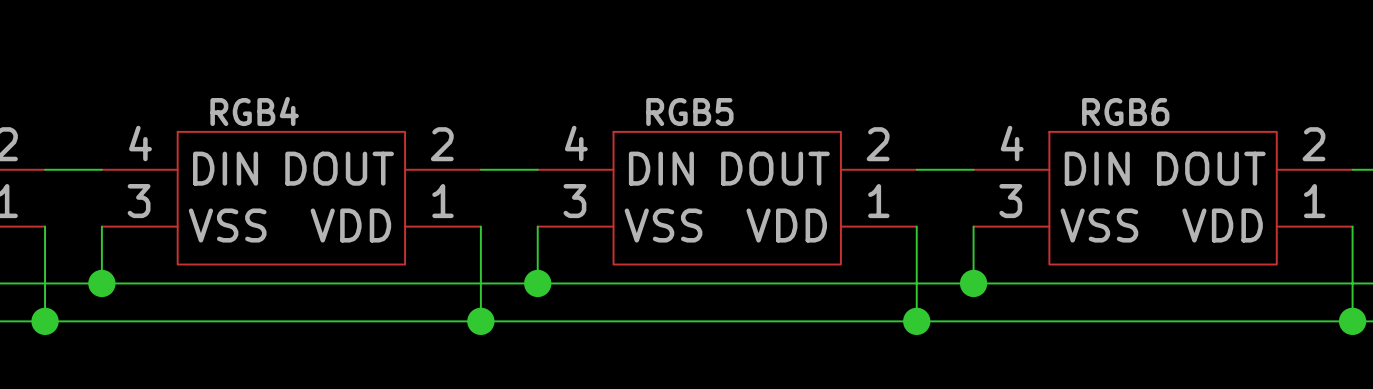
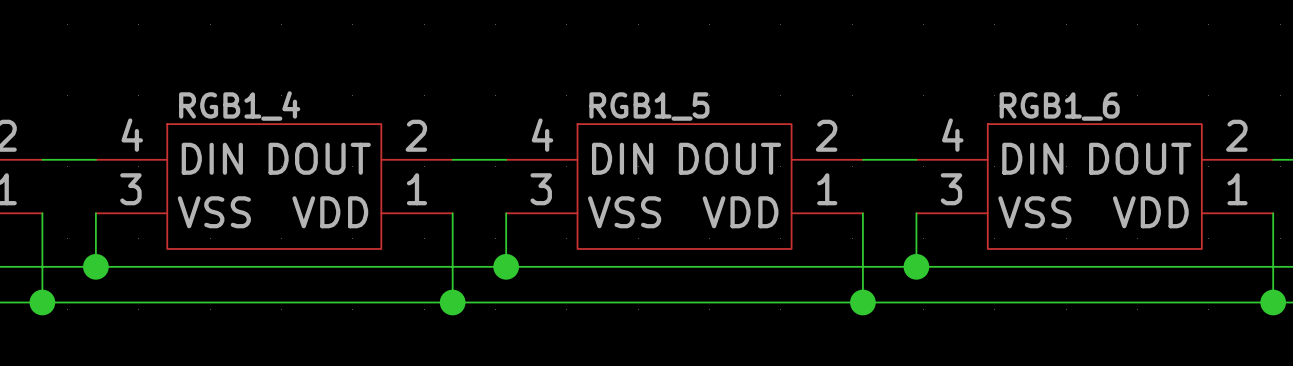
RGB4 name: RGB4 (254, 111) -> RGB1_4 (239, 105)
RGB5 name: RGB5 (689, 112) -> RGB1_5 (649, 106)
RGB6 name: RGB6 (1125, 112) -> RGB1_6 (1059, 106)

